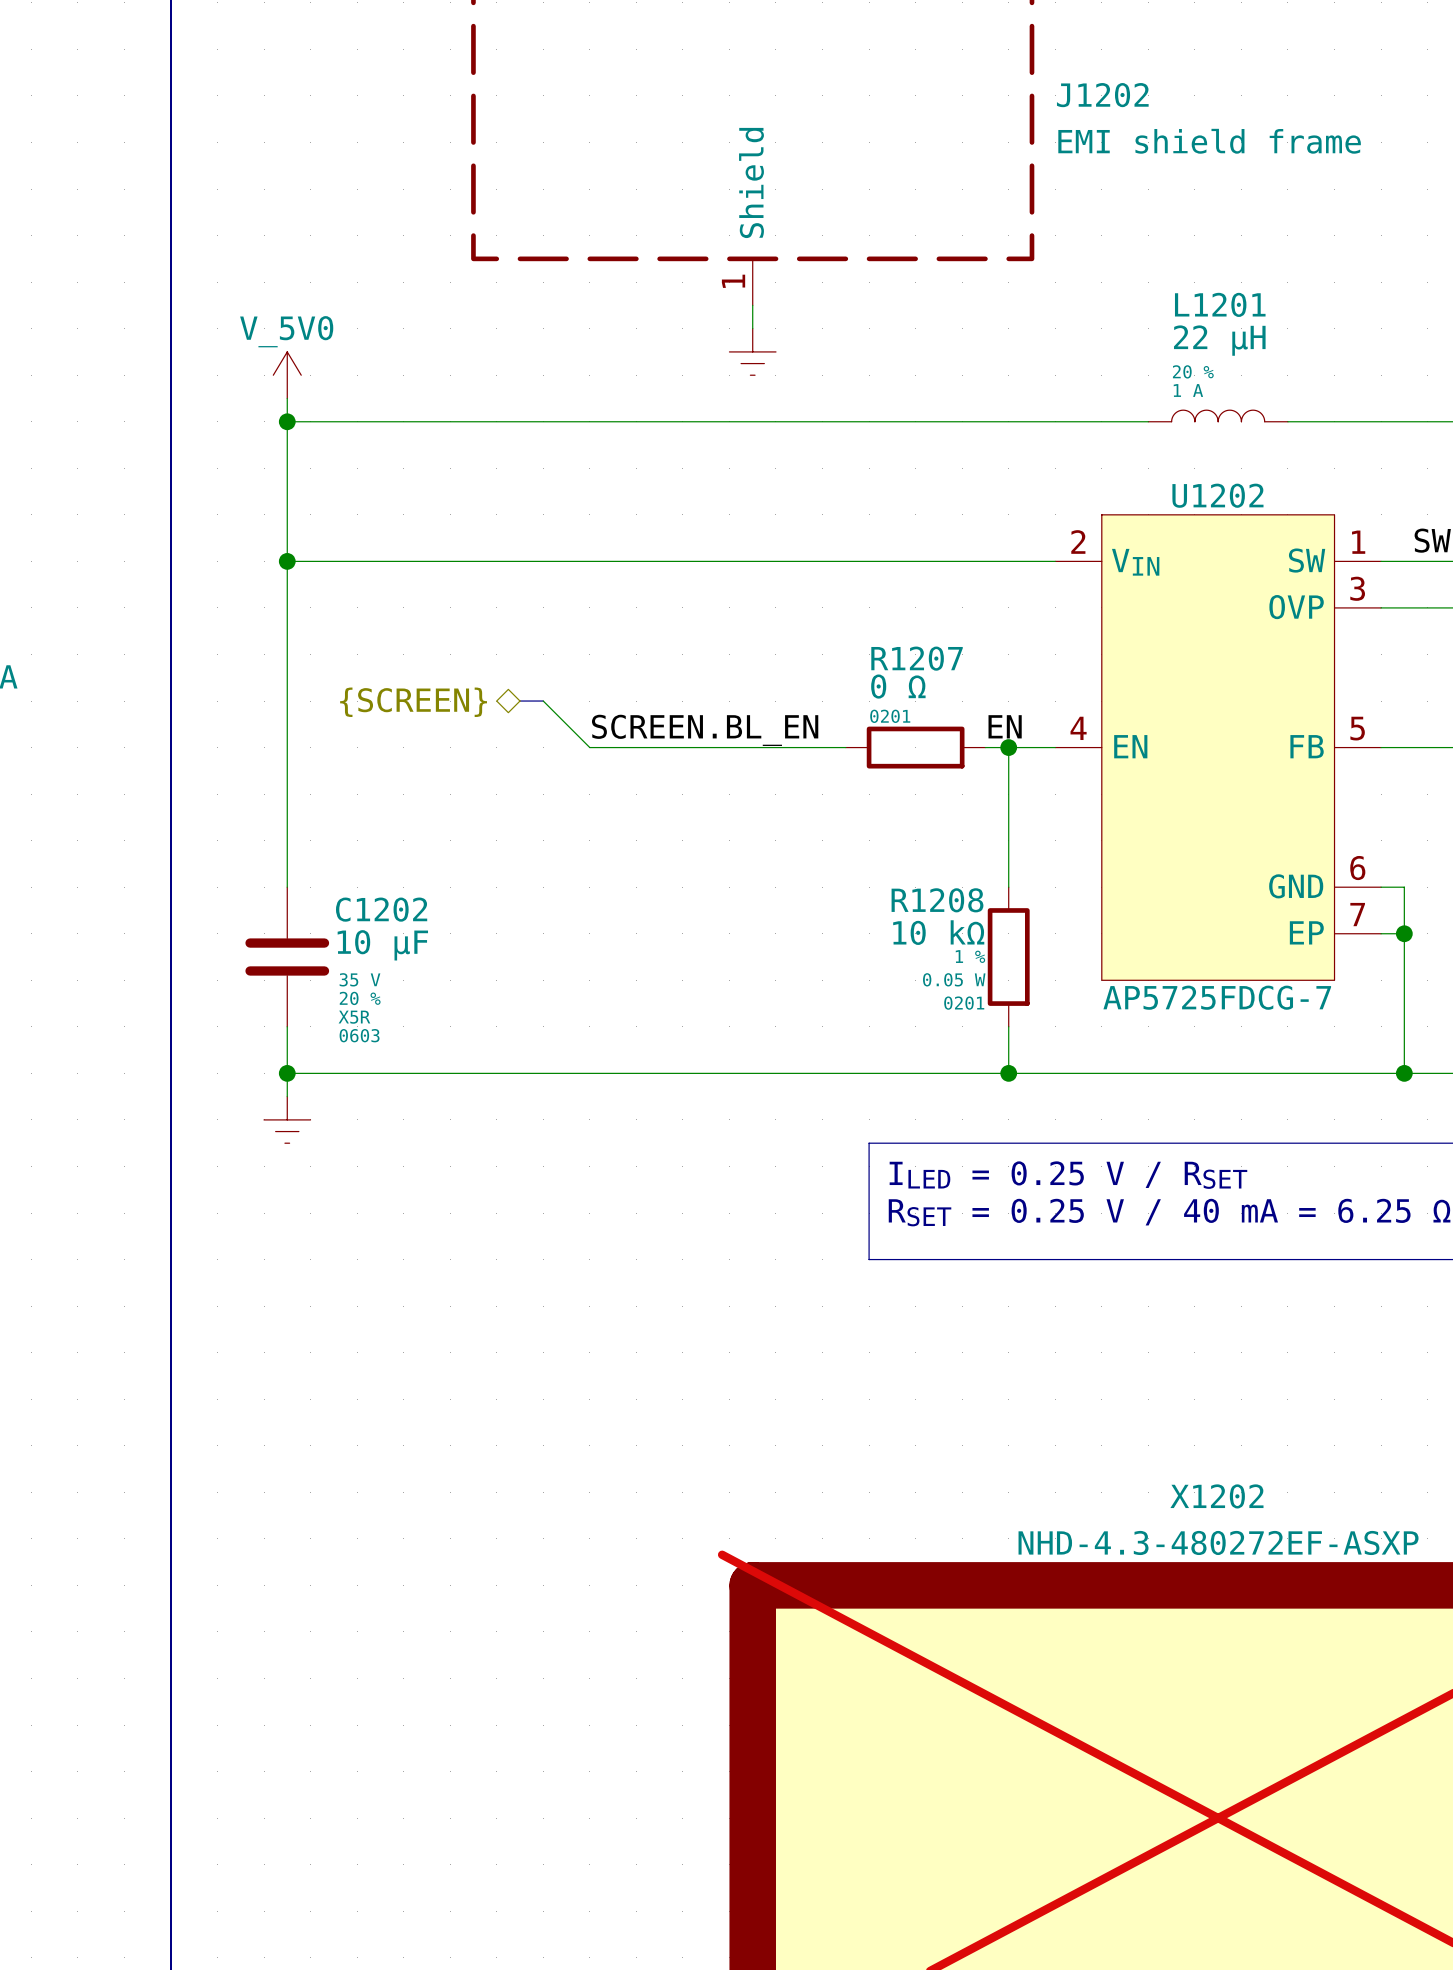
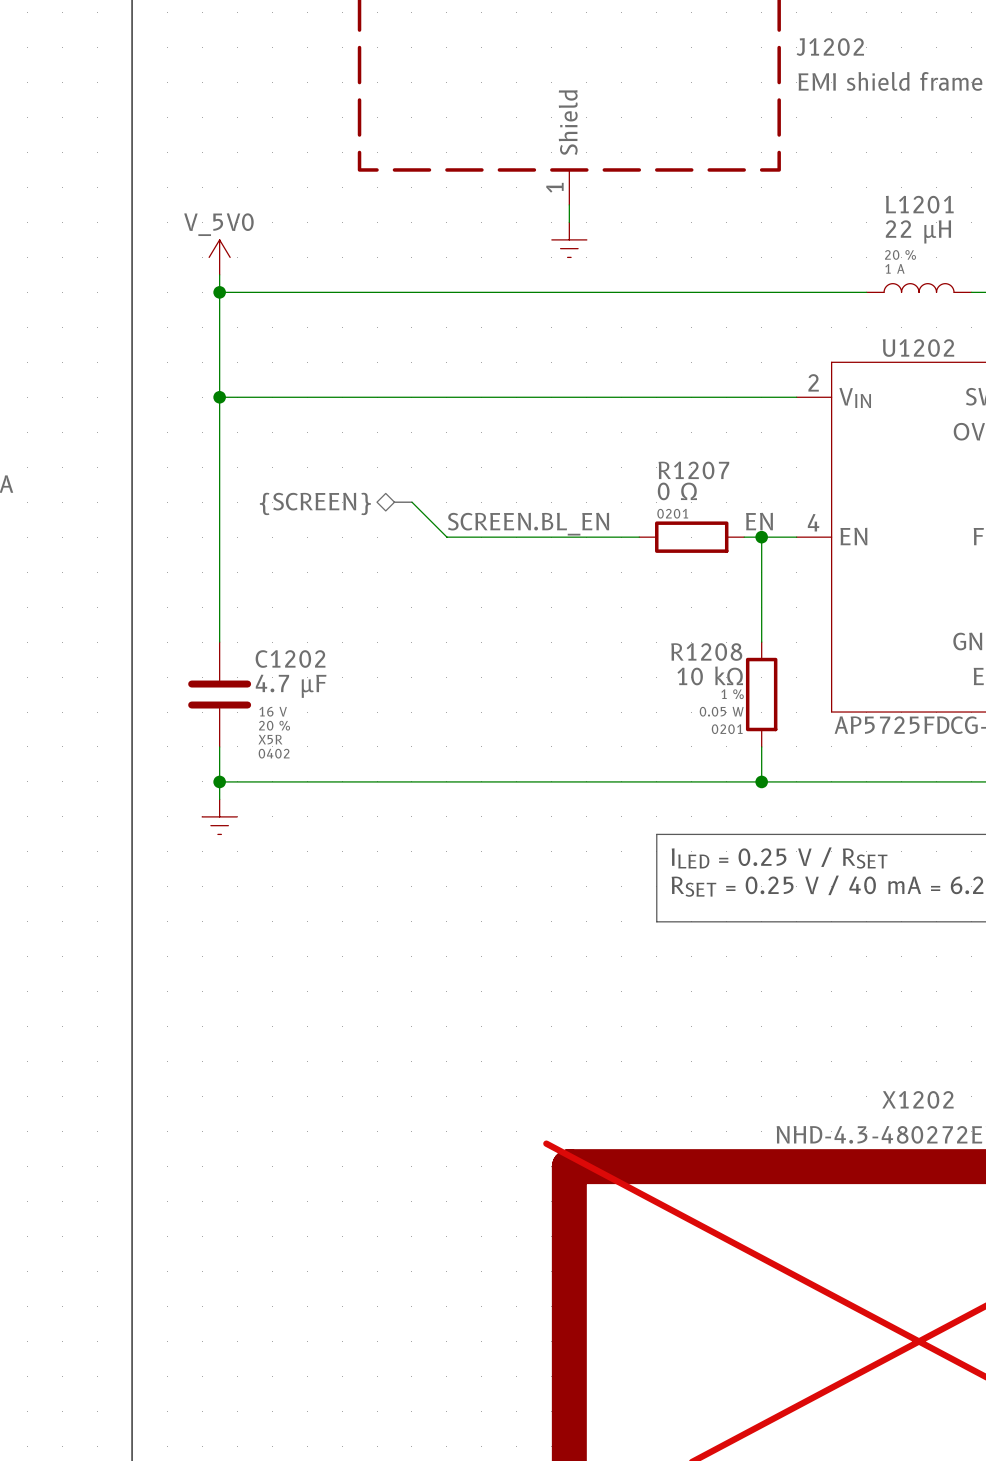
C1202 value: 10 µF (382, 945) -> 4.7 µF (291, 686)
C1202 text: 35 V (360, 979) -> 16 V (273, 711)
C1202 text: 0603 (359, 1035) -> 0402 (274, 753)

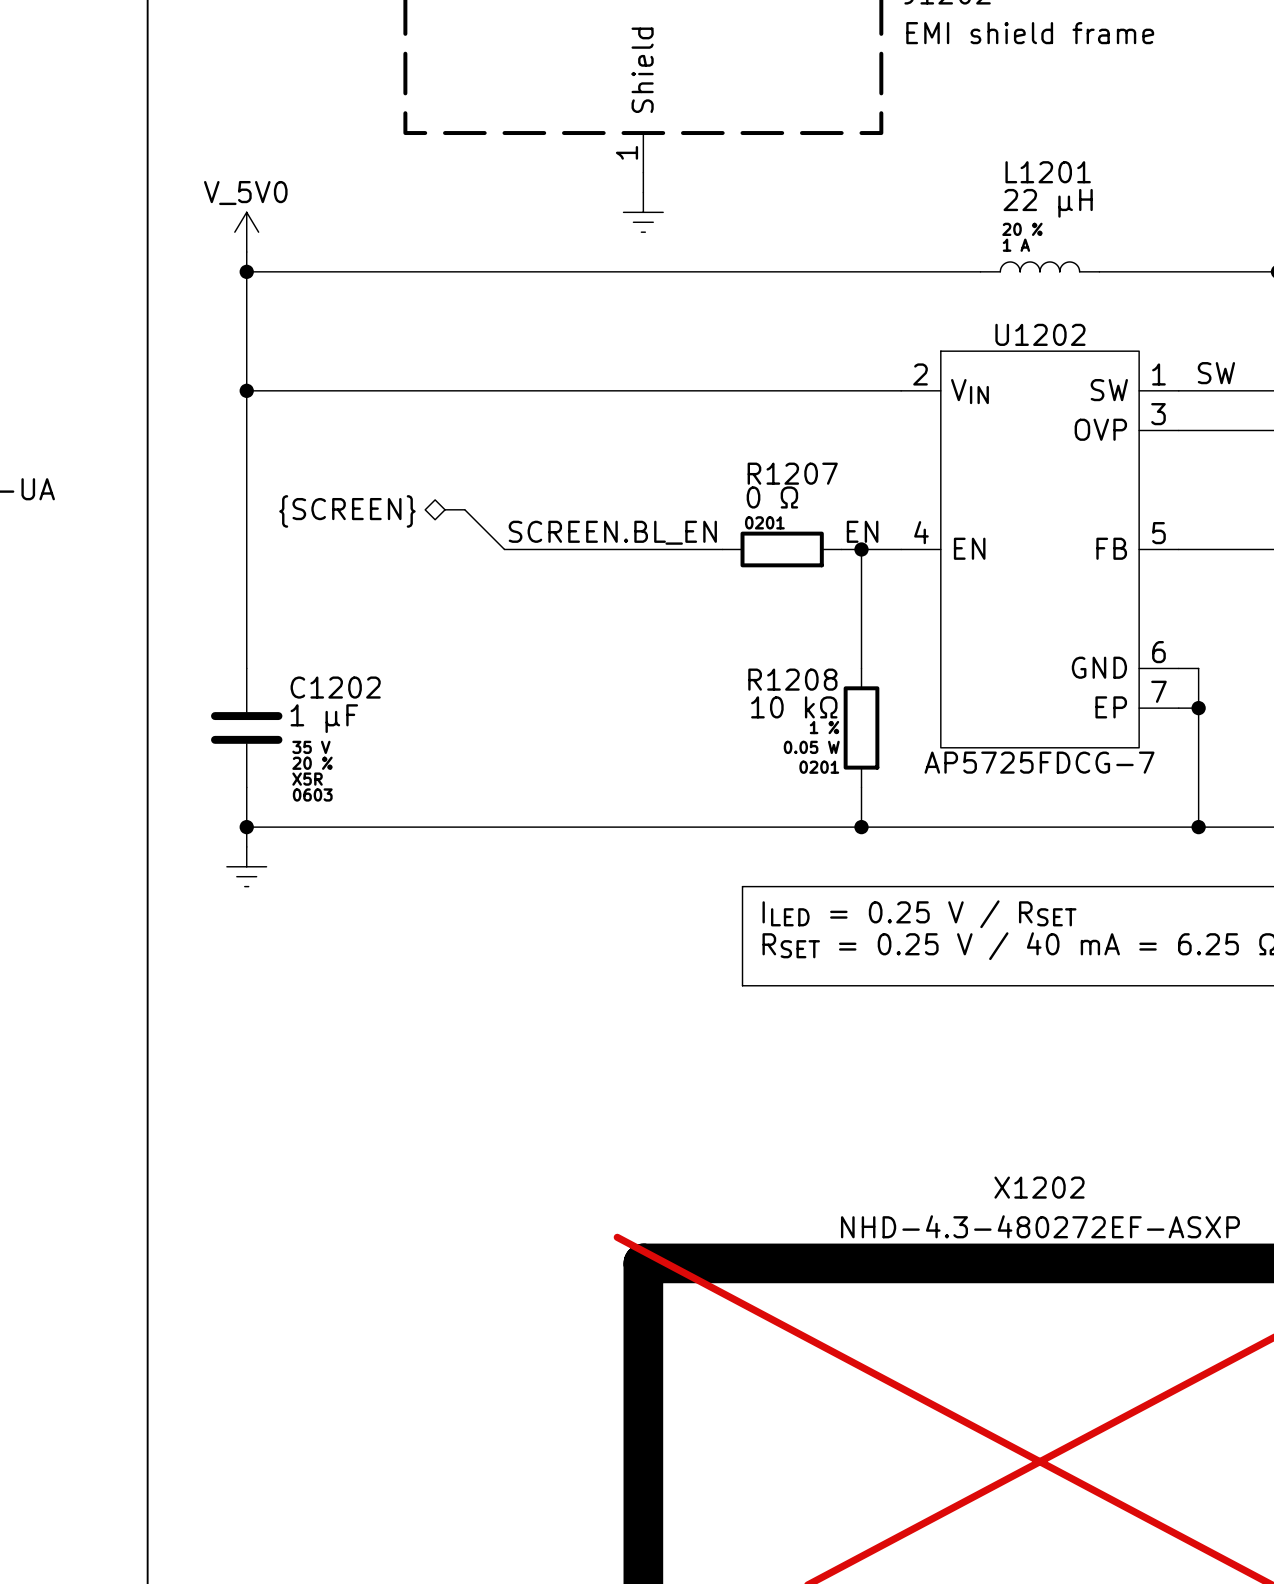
C1202 value: 4.7 µF (291, 686) -> 1 µF (324, 718)
C1202 text: 16 V (273, 711) -> 35 V (311, 747)
C1202 text: 0402 (274, 753) -> 0603 (312, 794)

